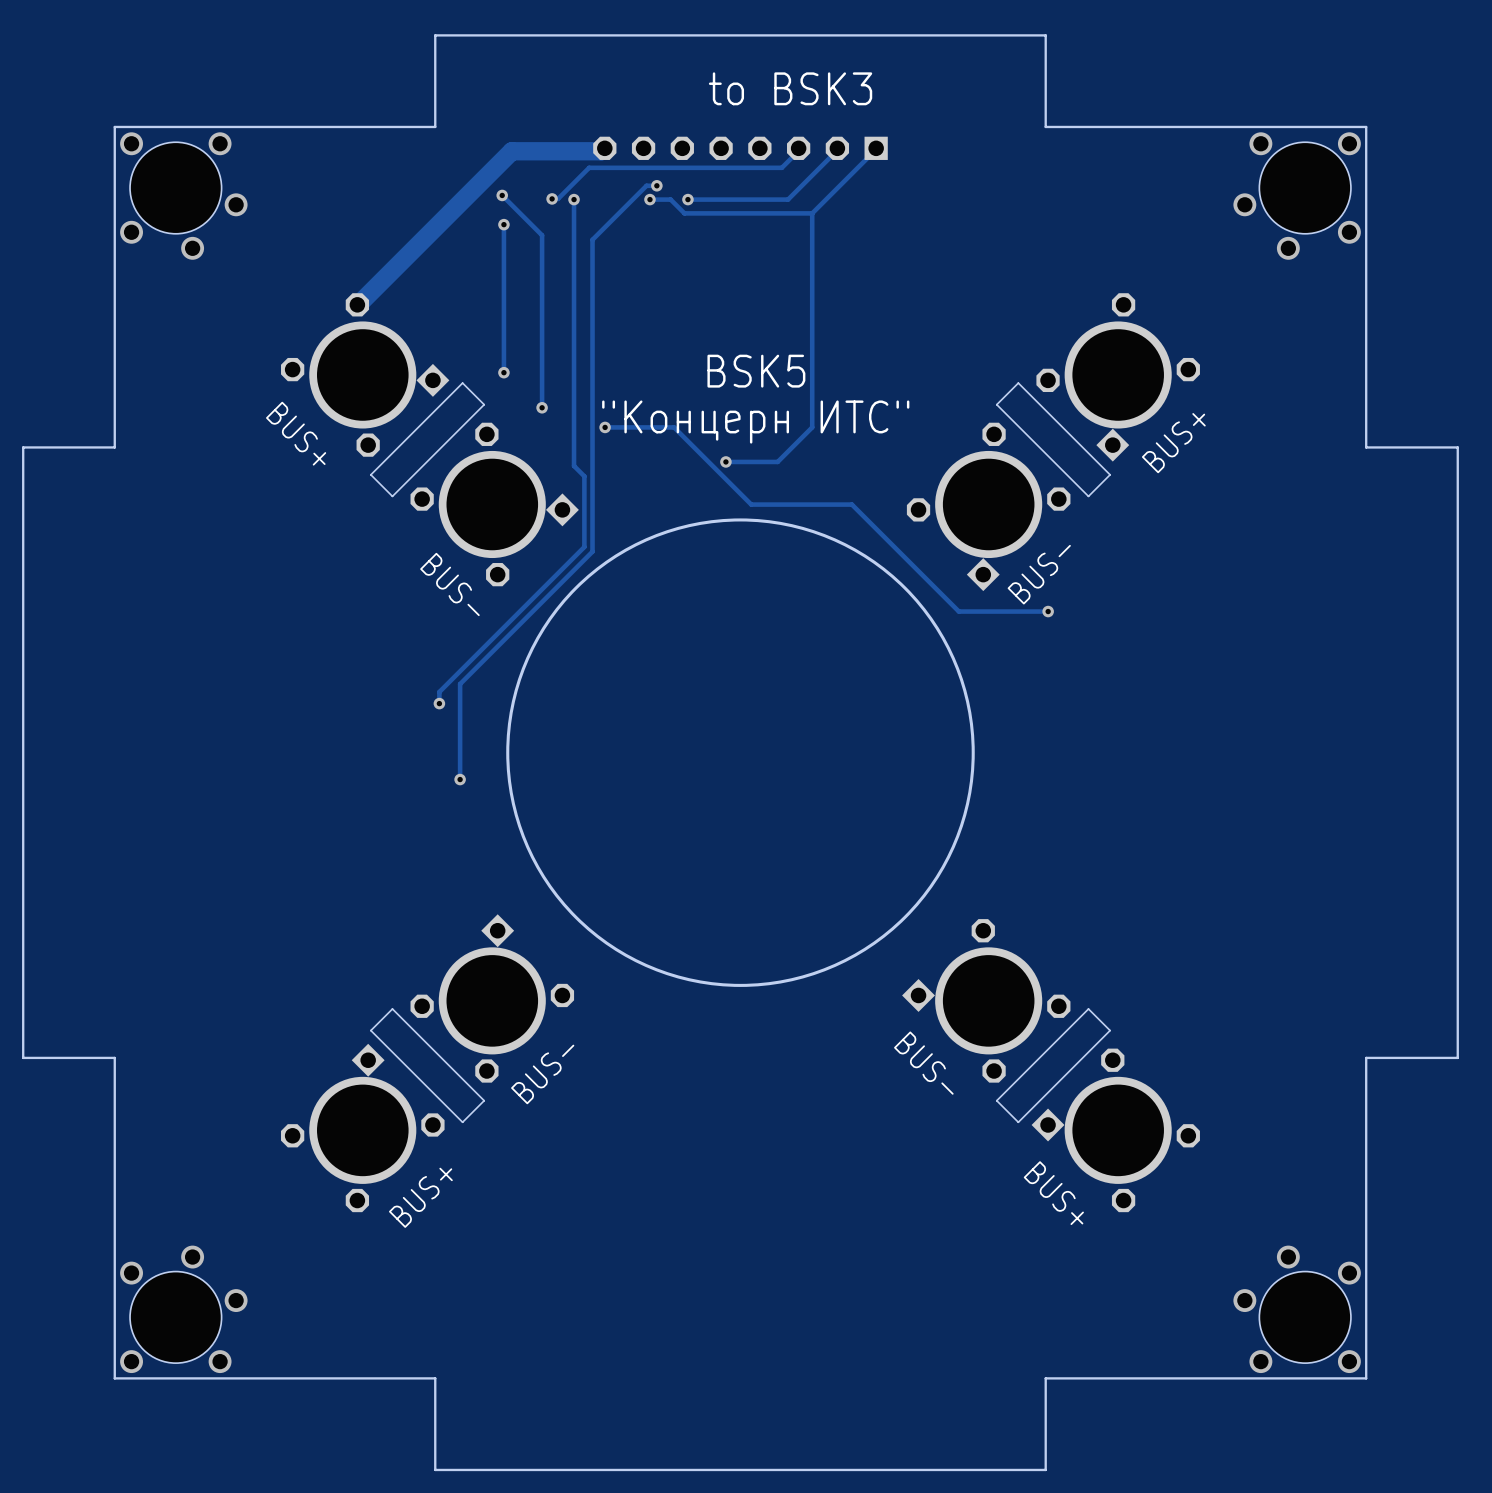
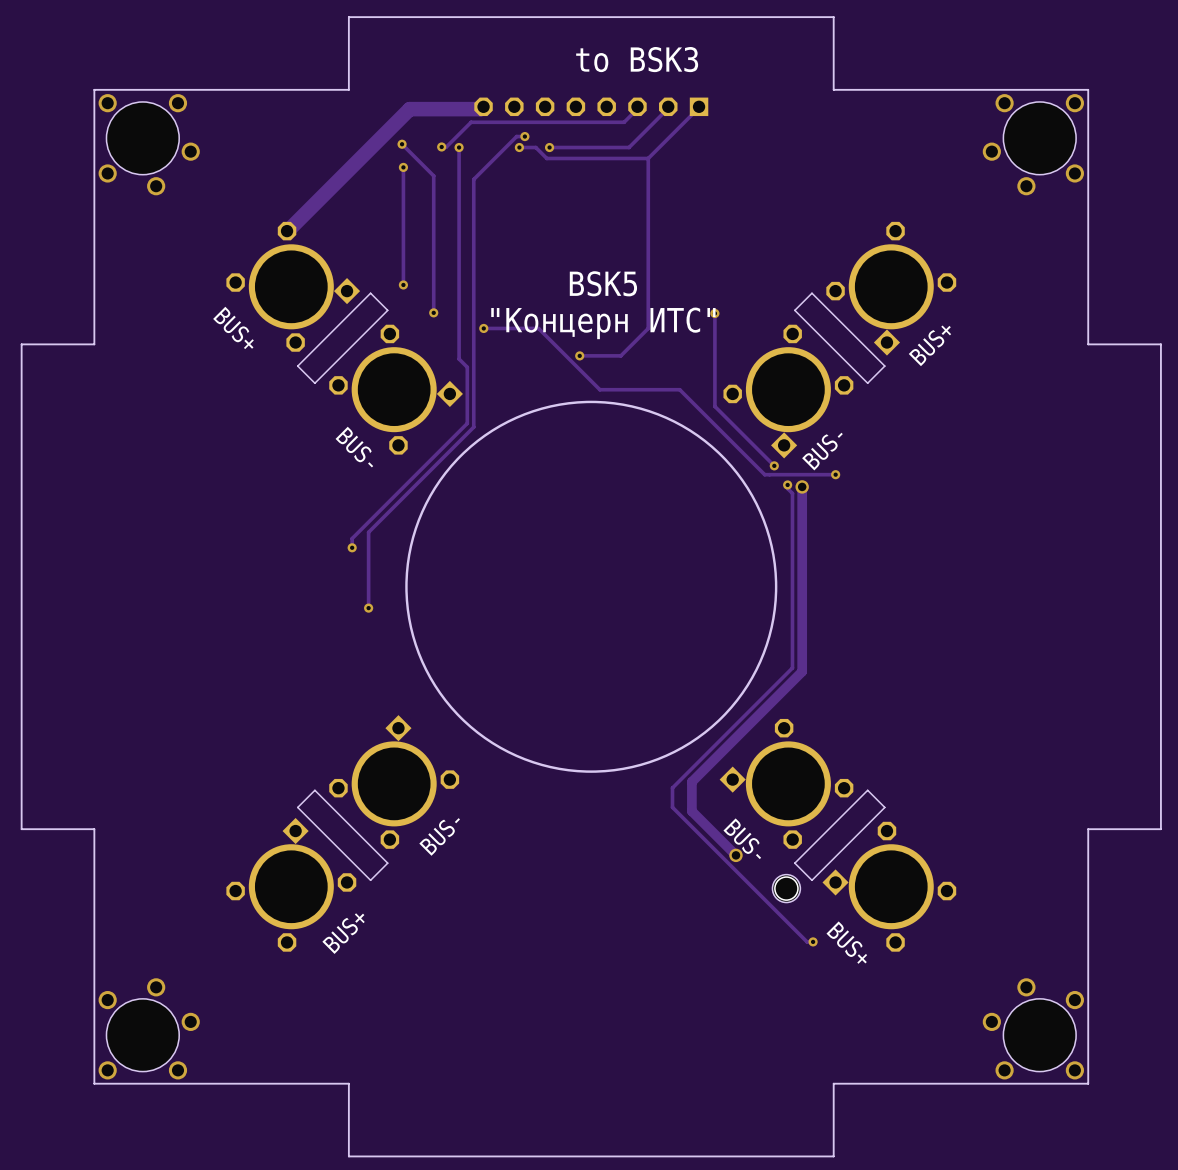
track: none -> (714, 313) (714, 406) (774, 465)
via: none -> (714, 313)
via: none -> (774, 465)
track: none -> (787, 484) (787, 488) (792, 493) (792, 667) (672, 787) (672, 807) (807, 941) (813, 941)
via: none -> (787, 484)
track: none -> (802, 486) (802, 671) (691, 781) (691, 811) (735, 855)
via: none -> (802, 486)
via: none -> (735, 855)
part: none -> (786, 888)
via: none -> (813, 941)

